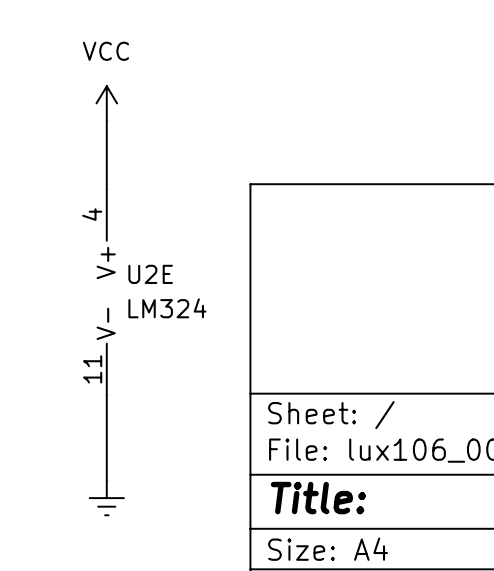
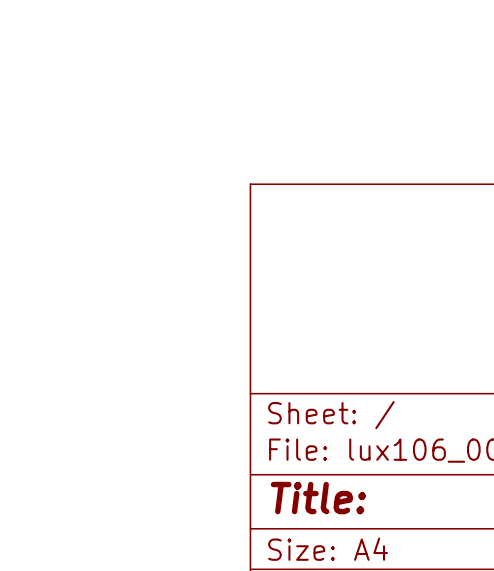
power symbol: VCC (106, 103) -> none
wire: (106, 120) (106, 189) -> none
U2E: LM324 (106, 292) -> none
wire: (106, 395) (106, 480) -> none
power symbol: (106, 498) -> none

